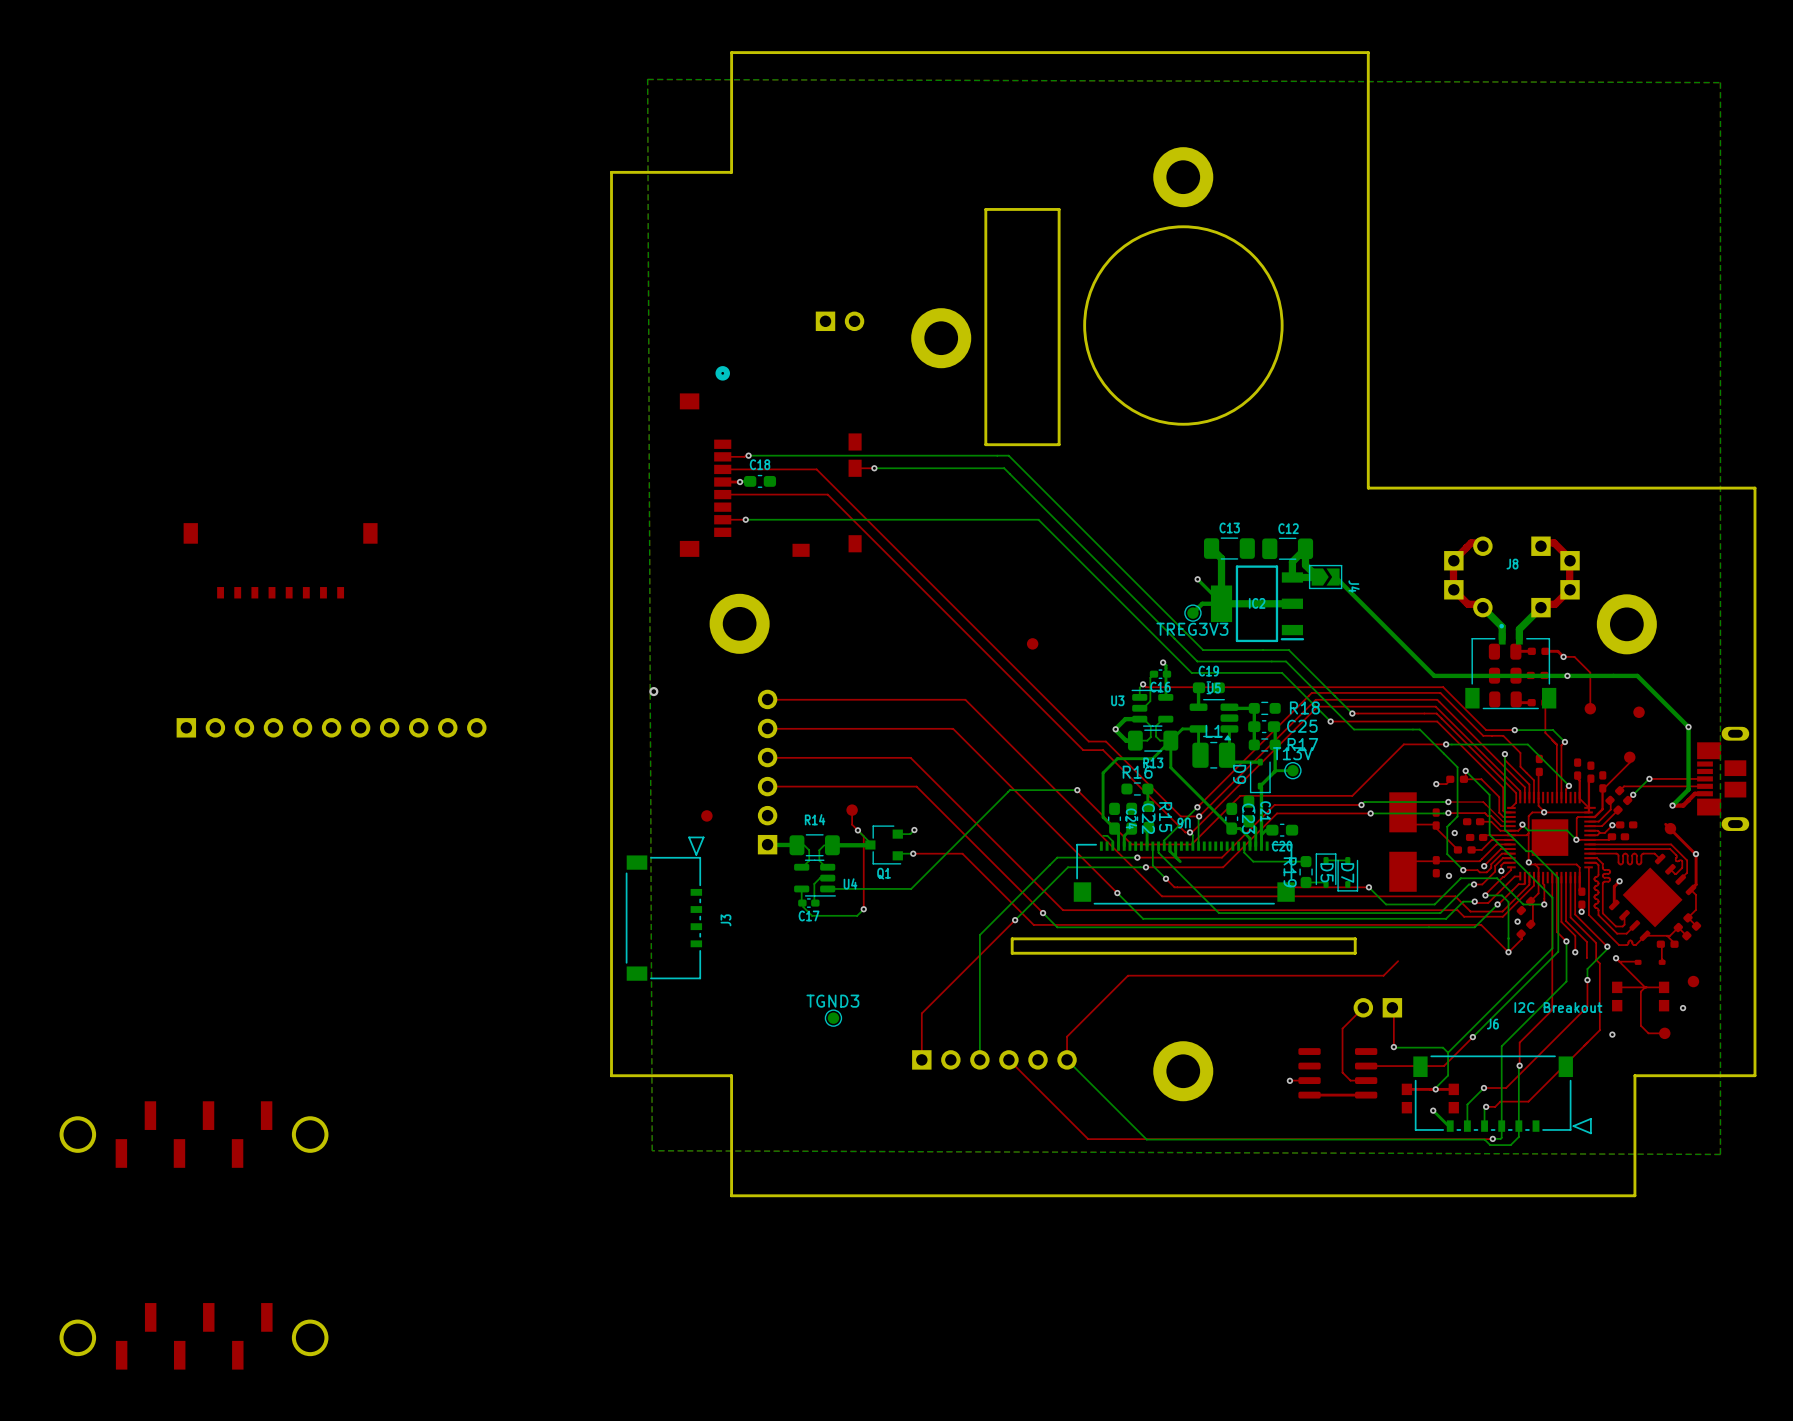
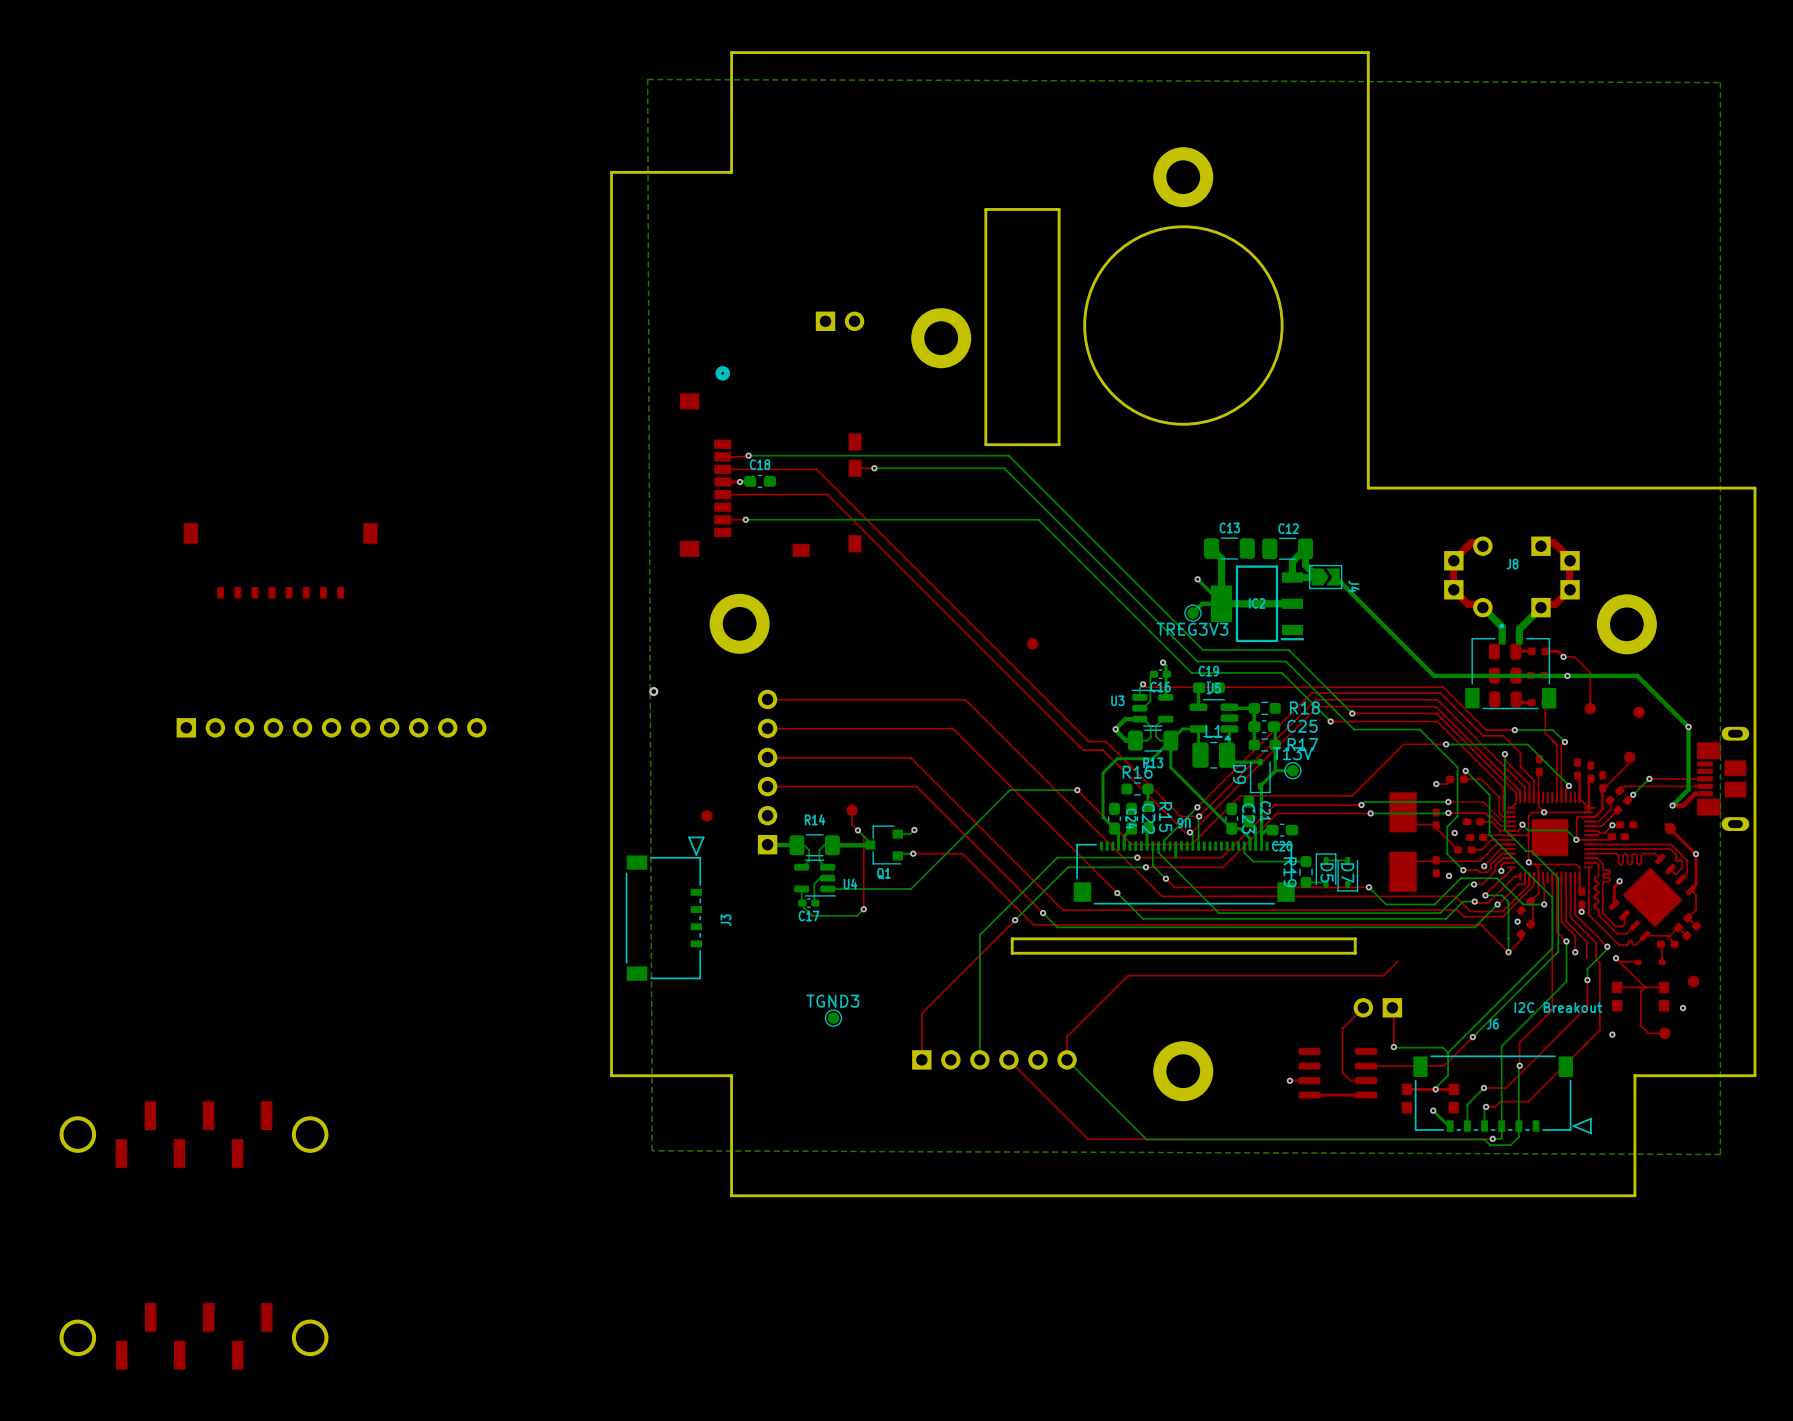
bottom track: (1103, 835) (1107, 835) (1112, 841) (1112, 846) -> none
bottom track: (1169, 846) (1169, 851) (1180, 861) -> none

